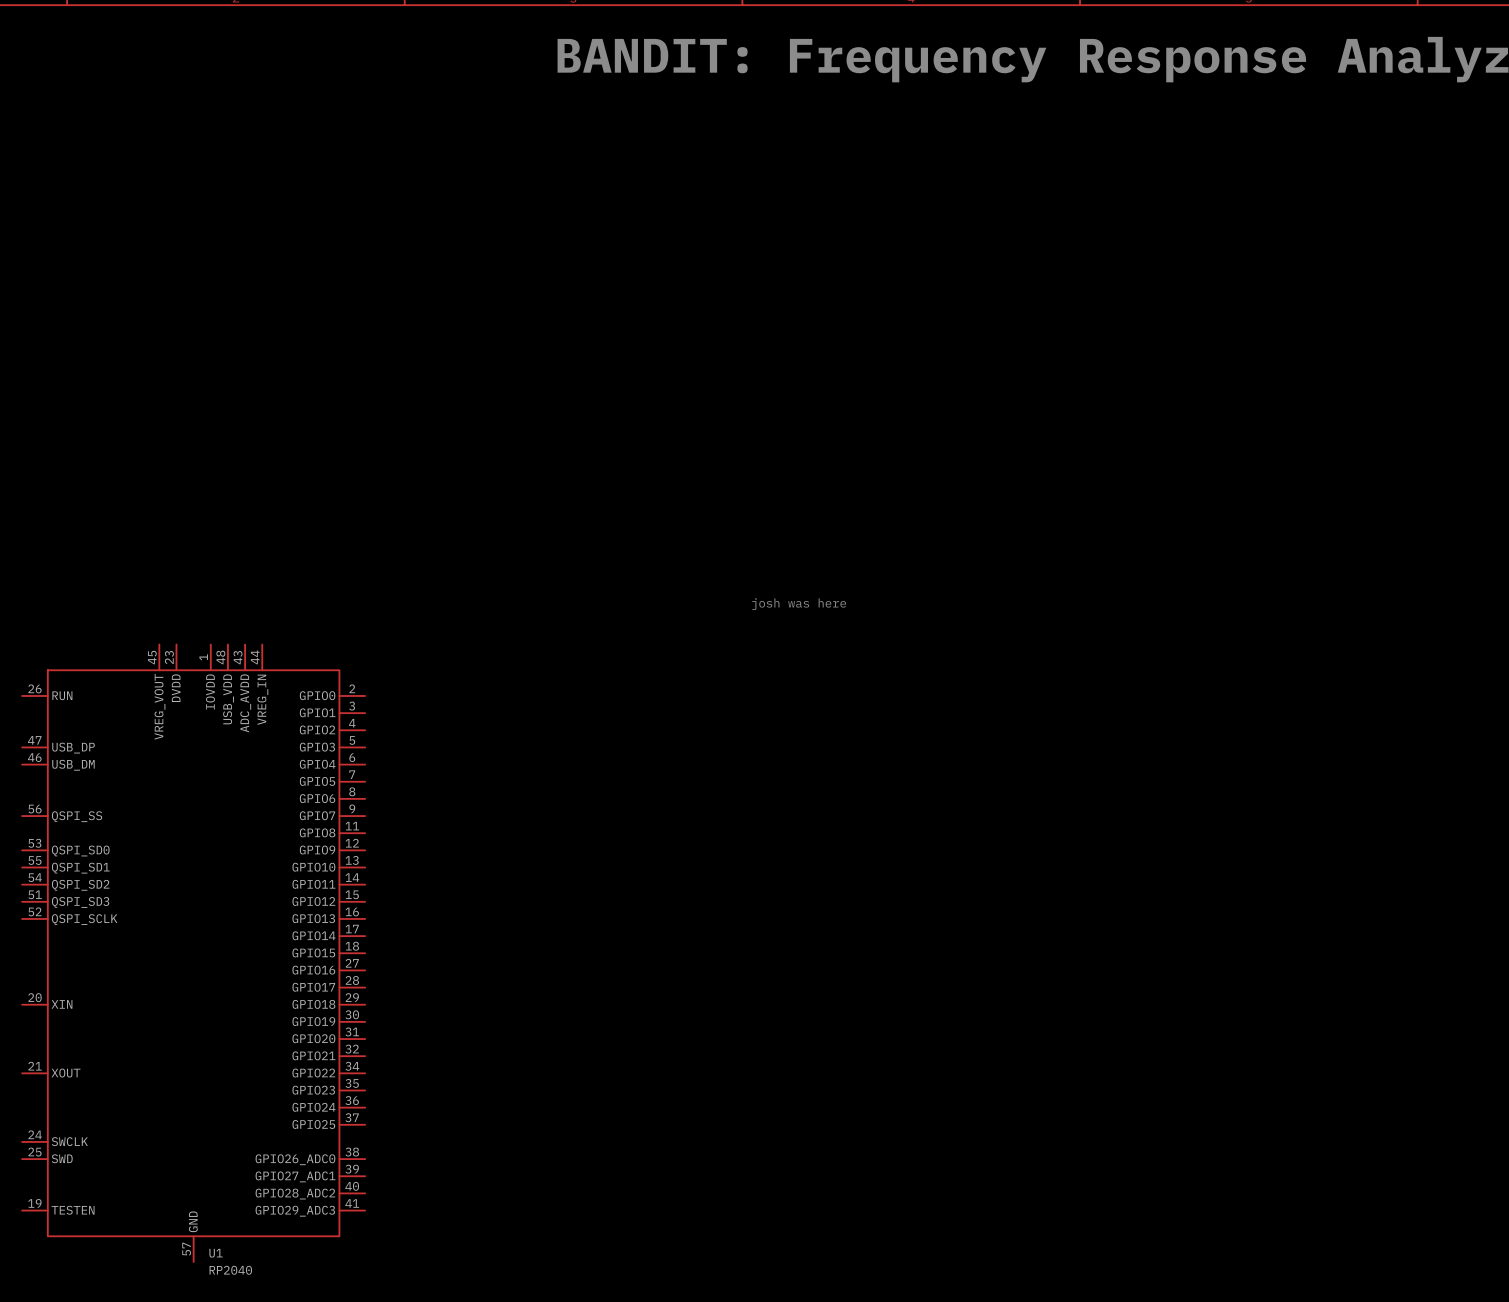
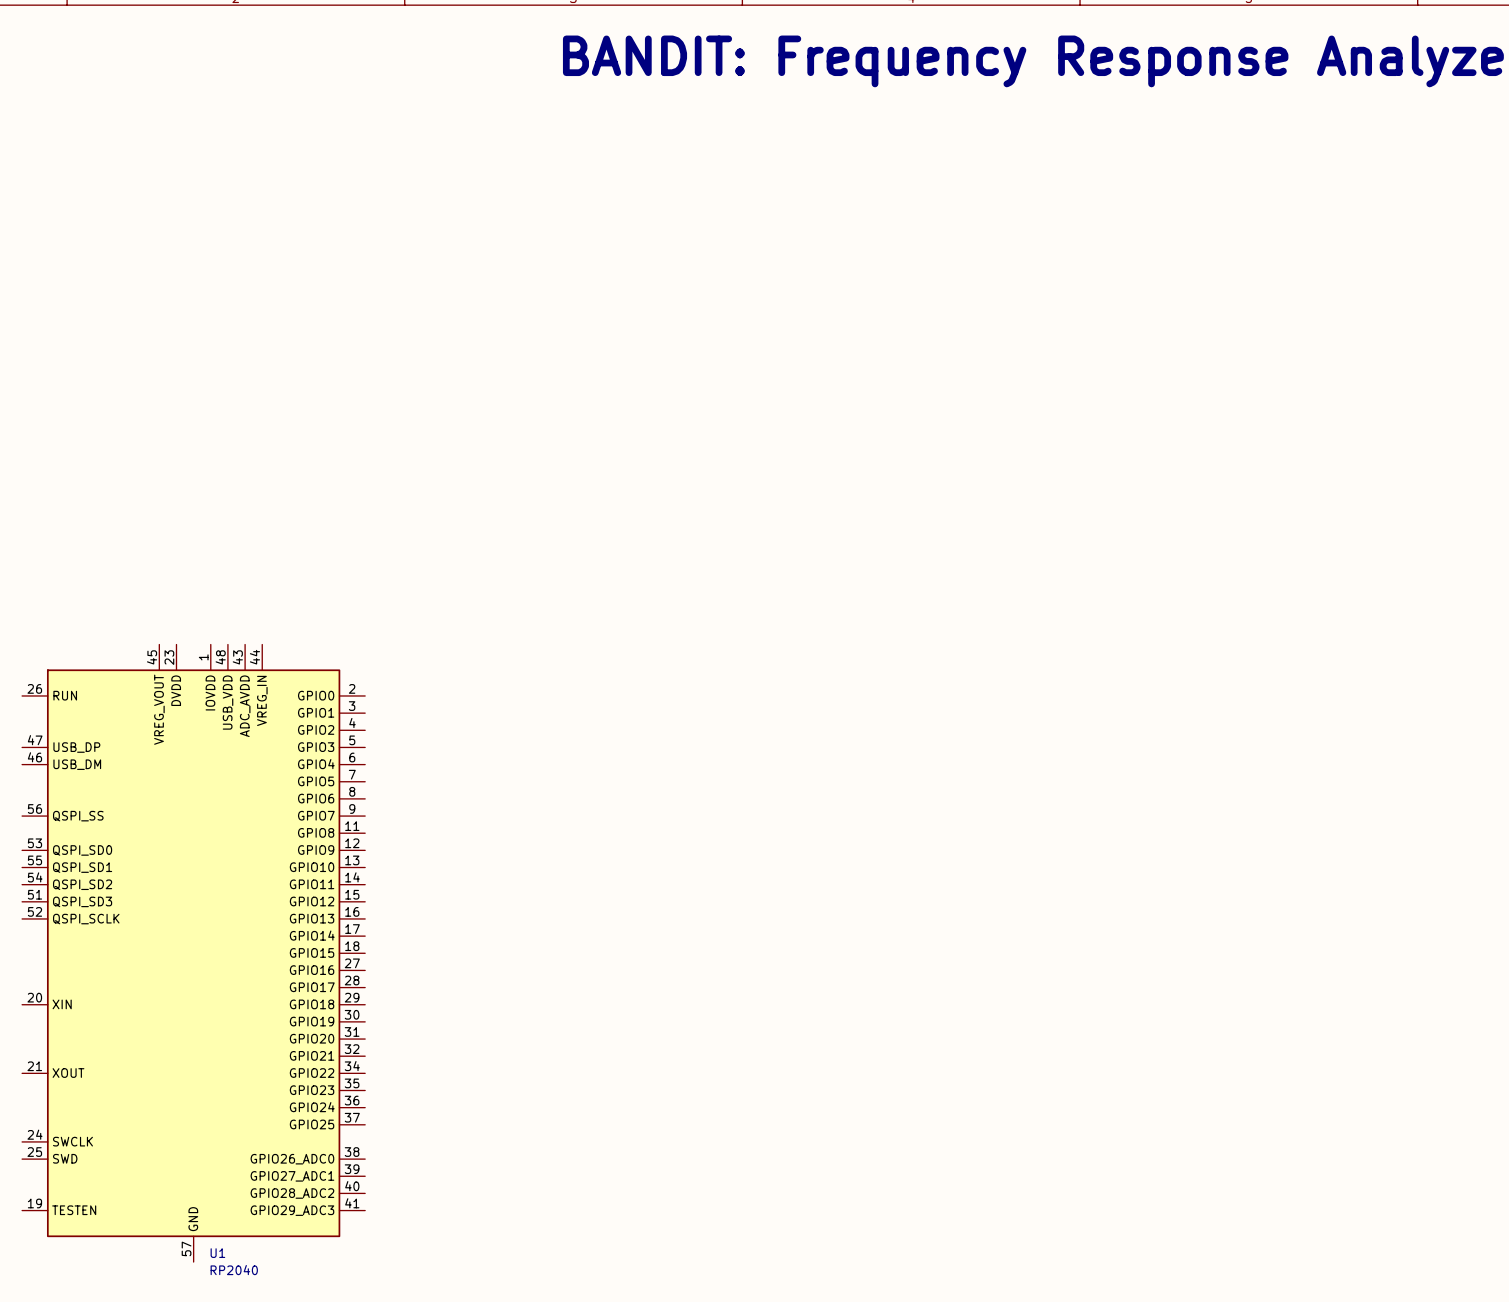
text: josh was here (799, 604) -> none

